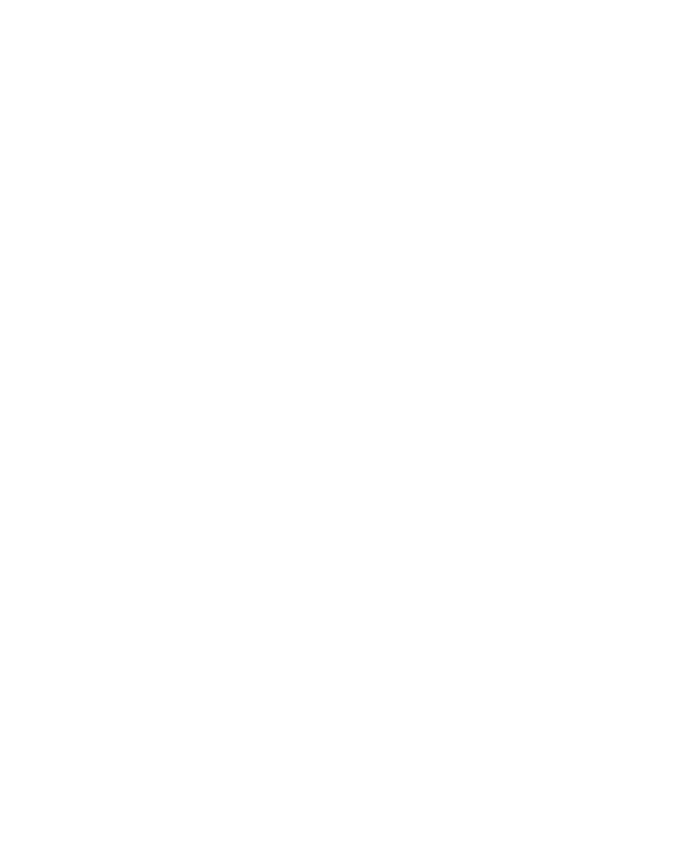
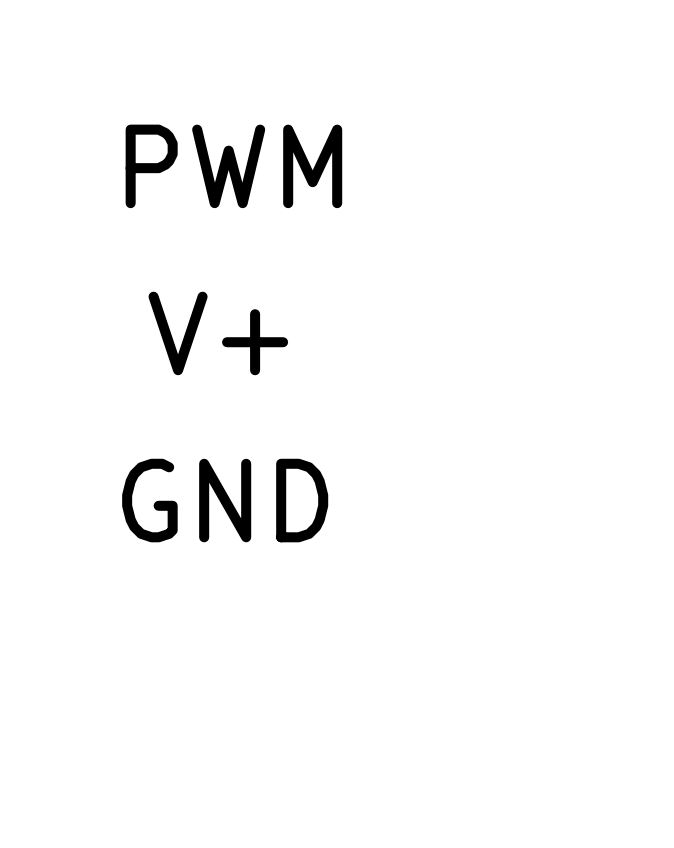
text: none -> PWM (233, 166)
text: none -> V+ (218, 333)
text: none -> GND (225, 500)

